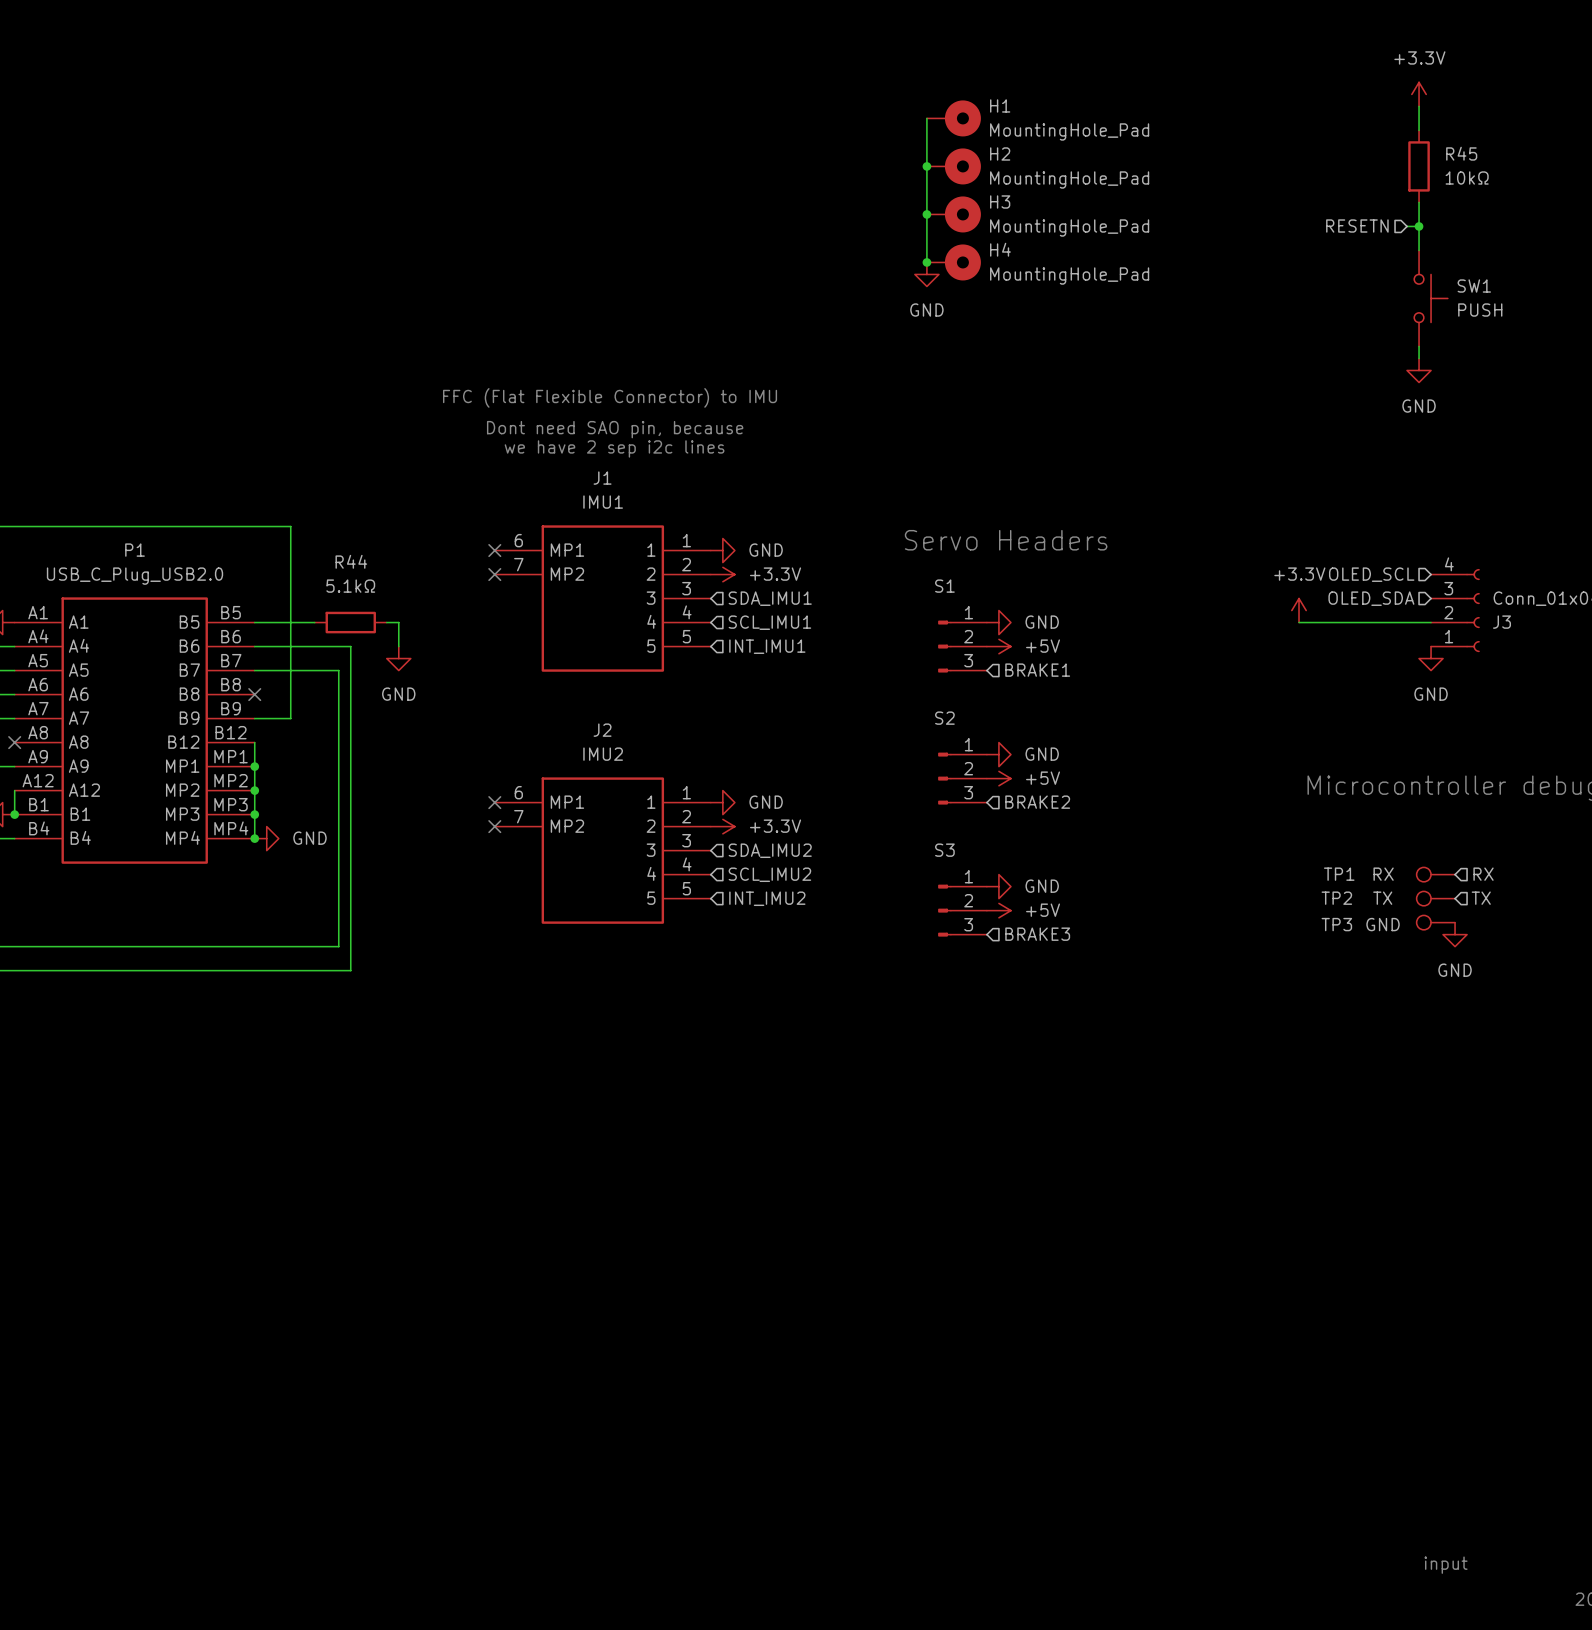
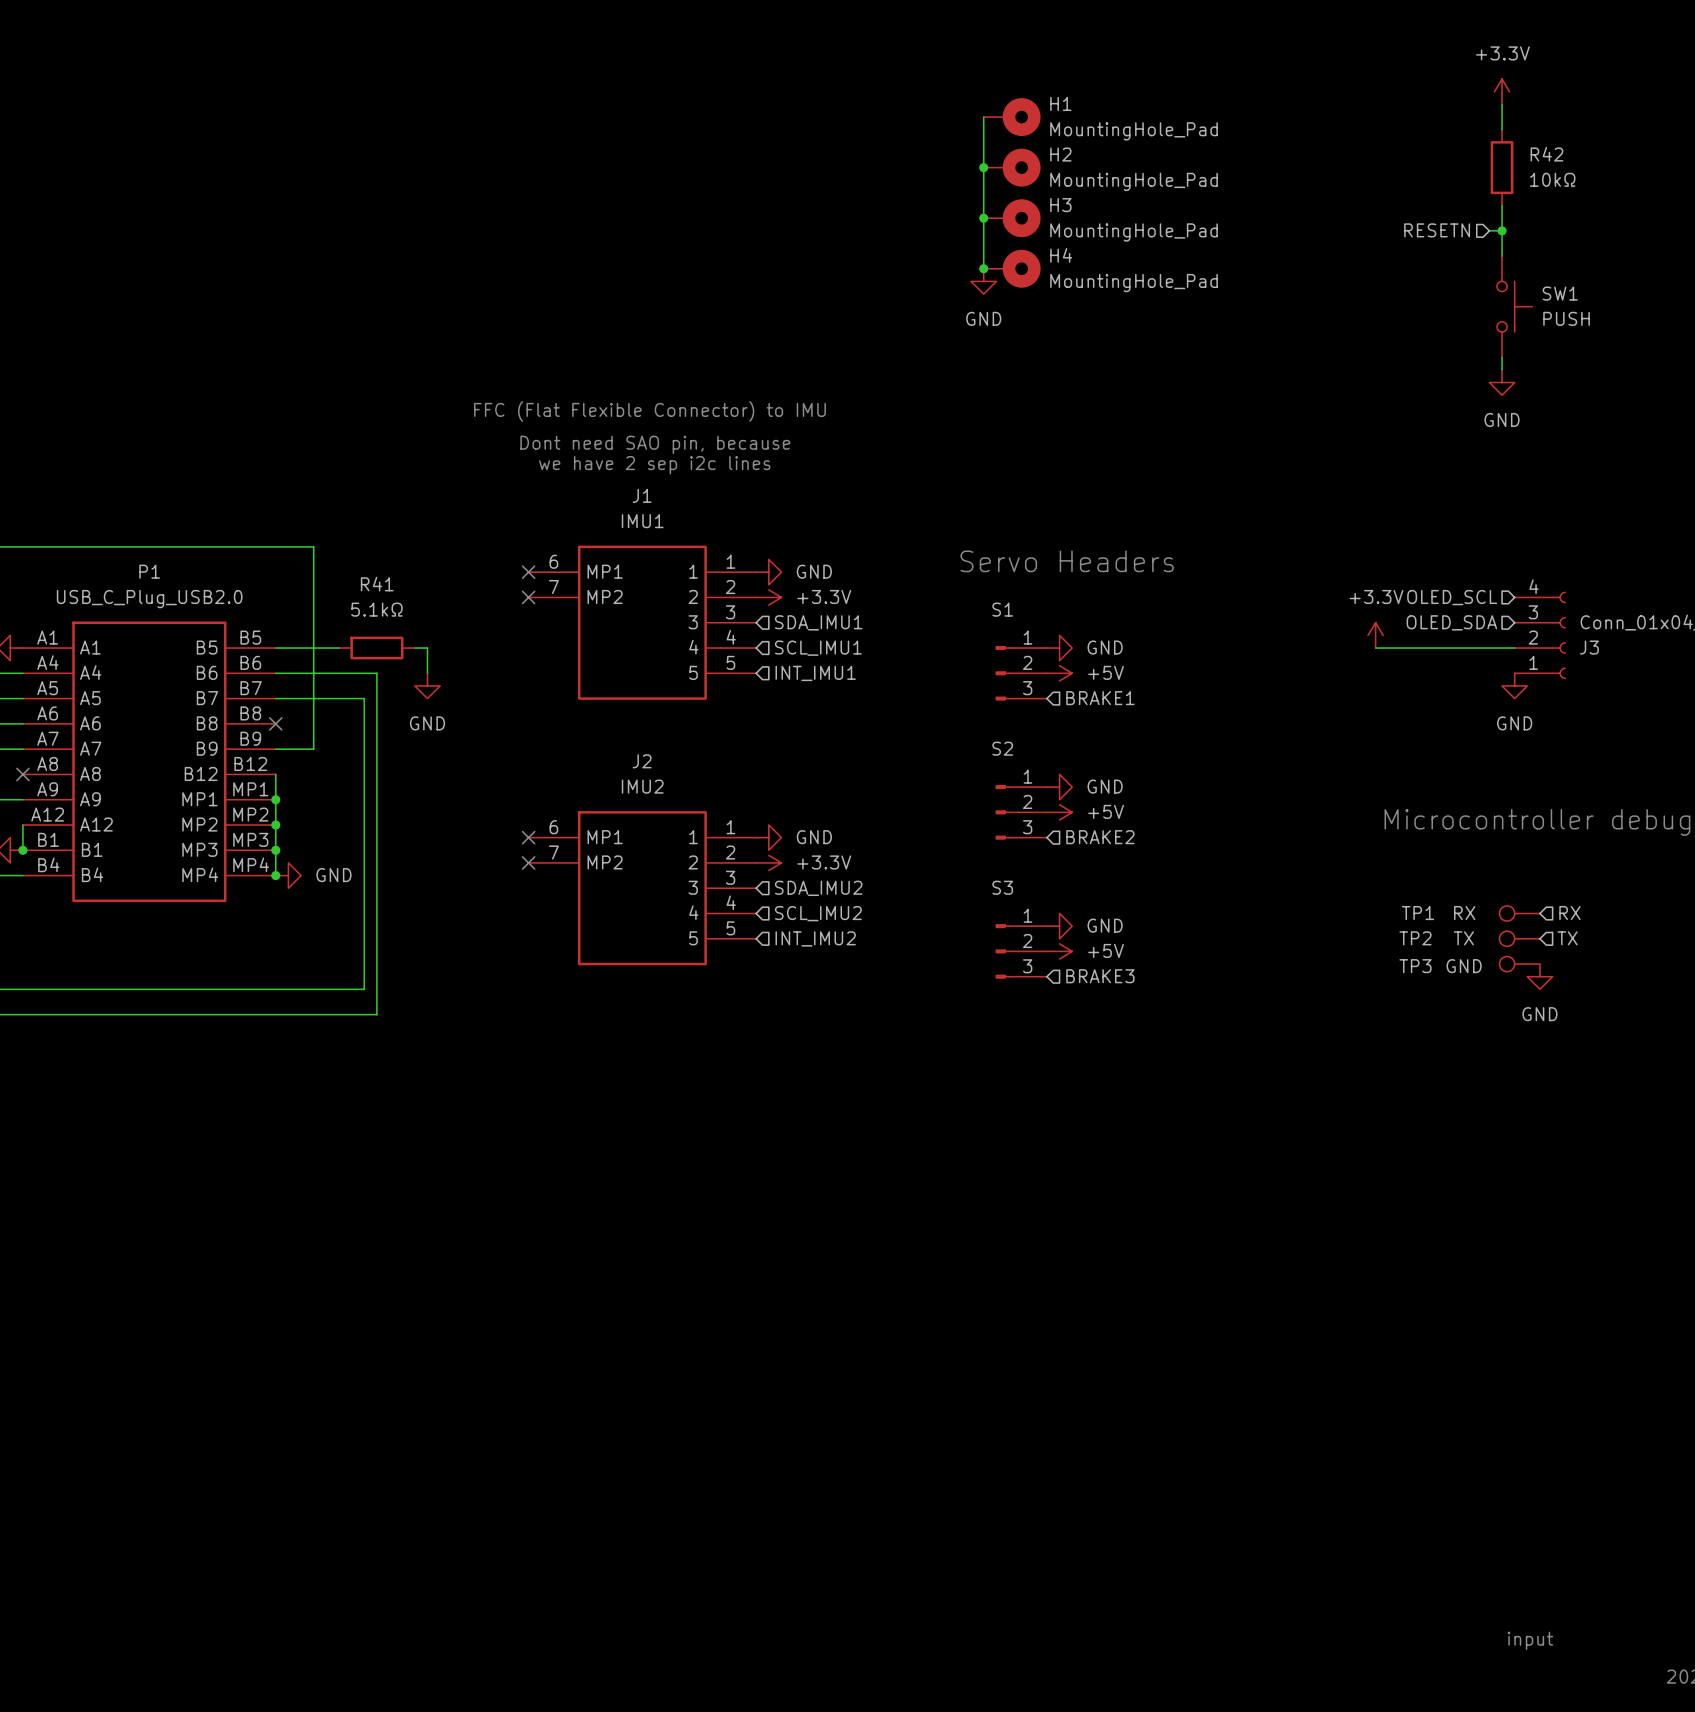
R45 name: R45 (1461, 153) -> R42 (1546, 154)
R44 name: R44 (351, 561) -> R41 (377, 584)

